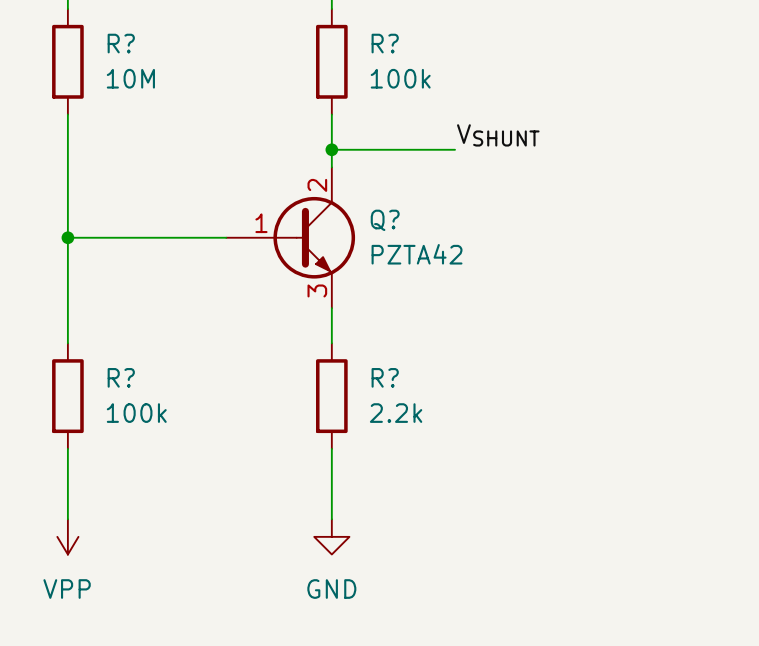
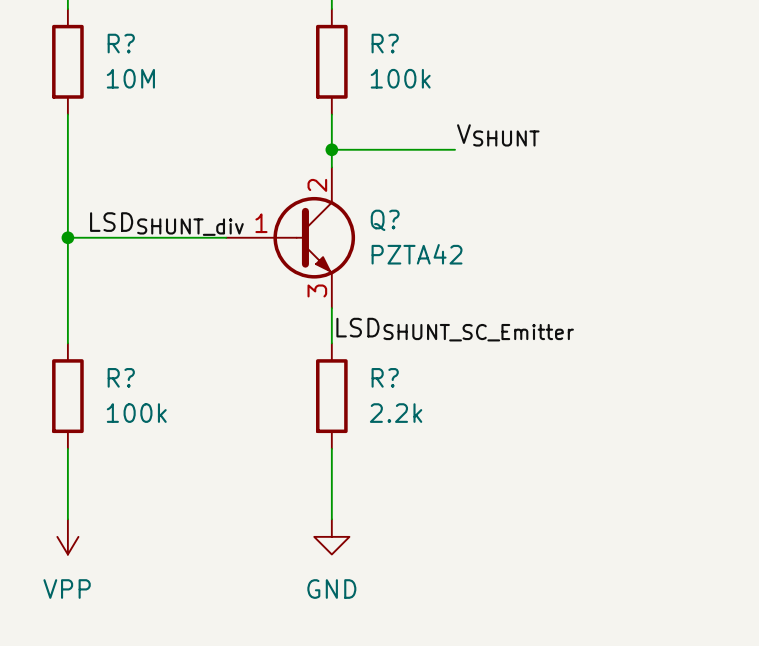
label: none -> LSDSHUNT_div (166, 224)
label: none -> LSDSHUNT_SC_Emitter (455, 329)

